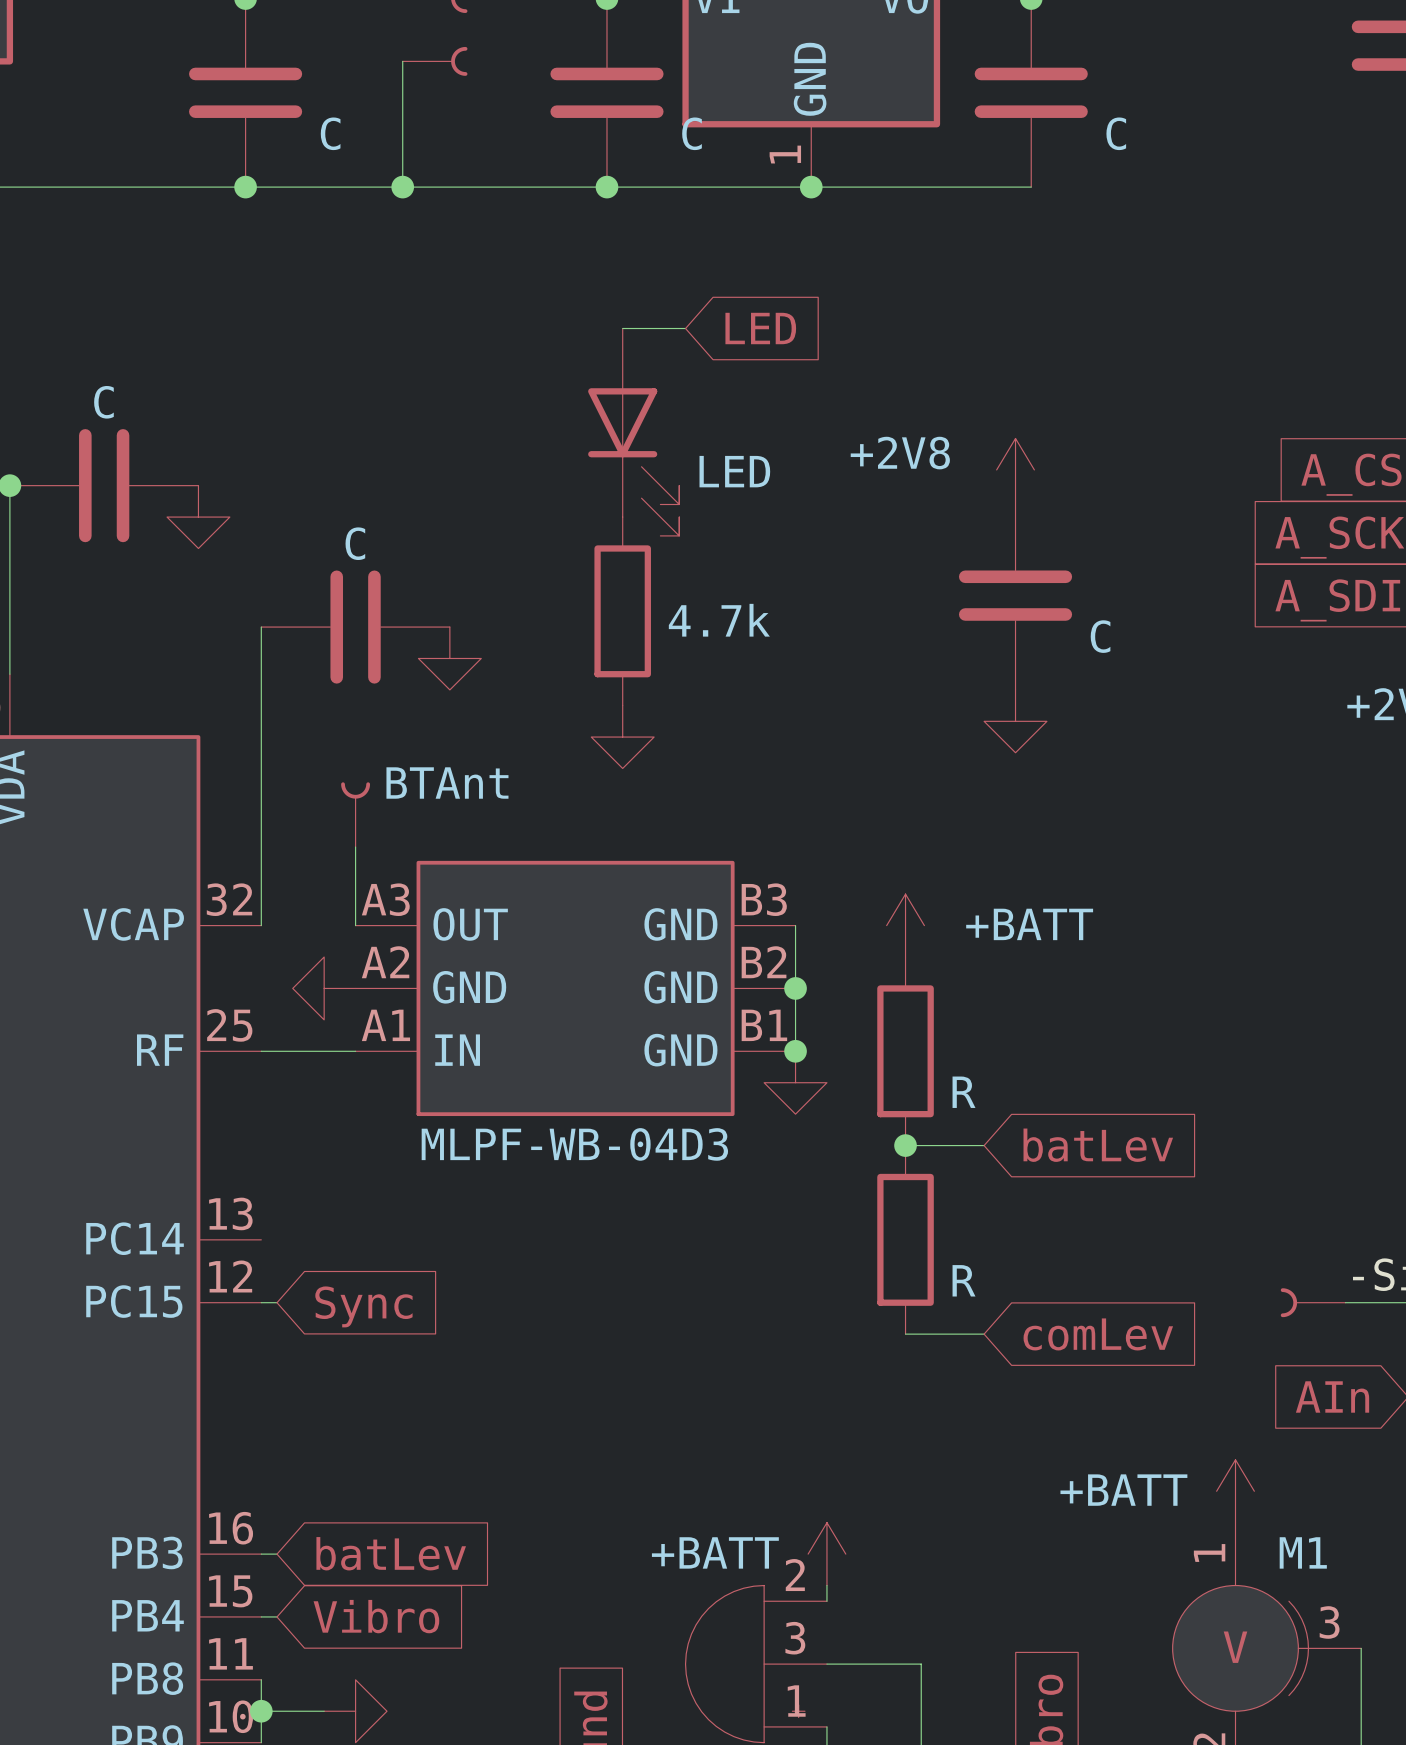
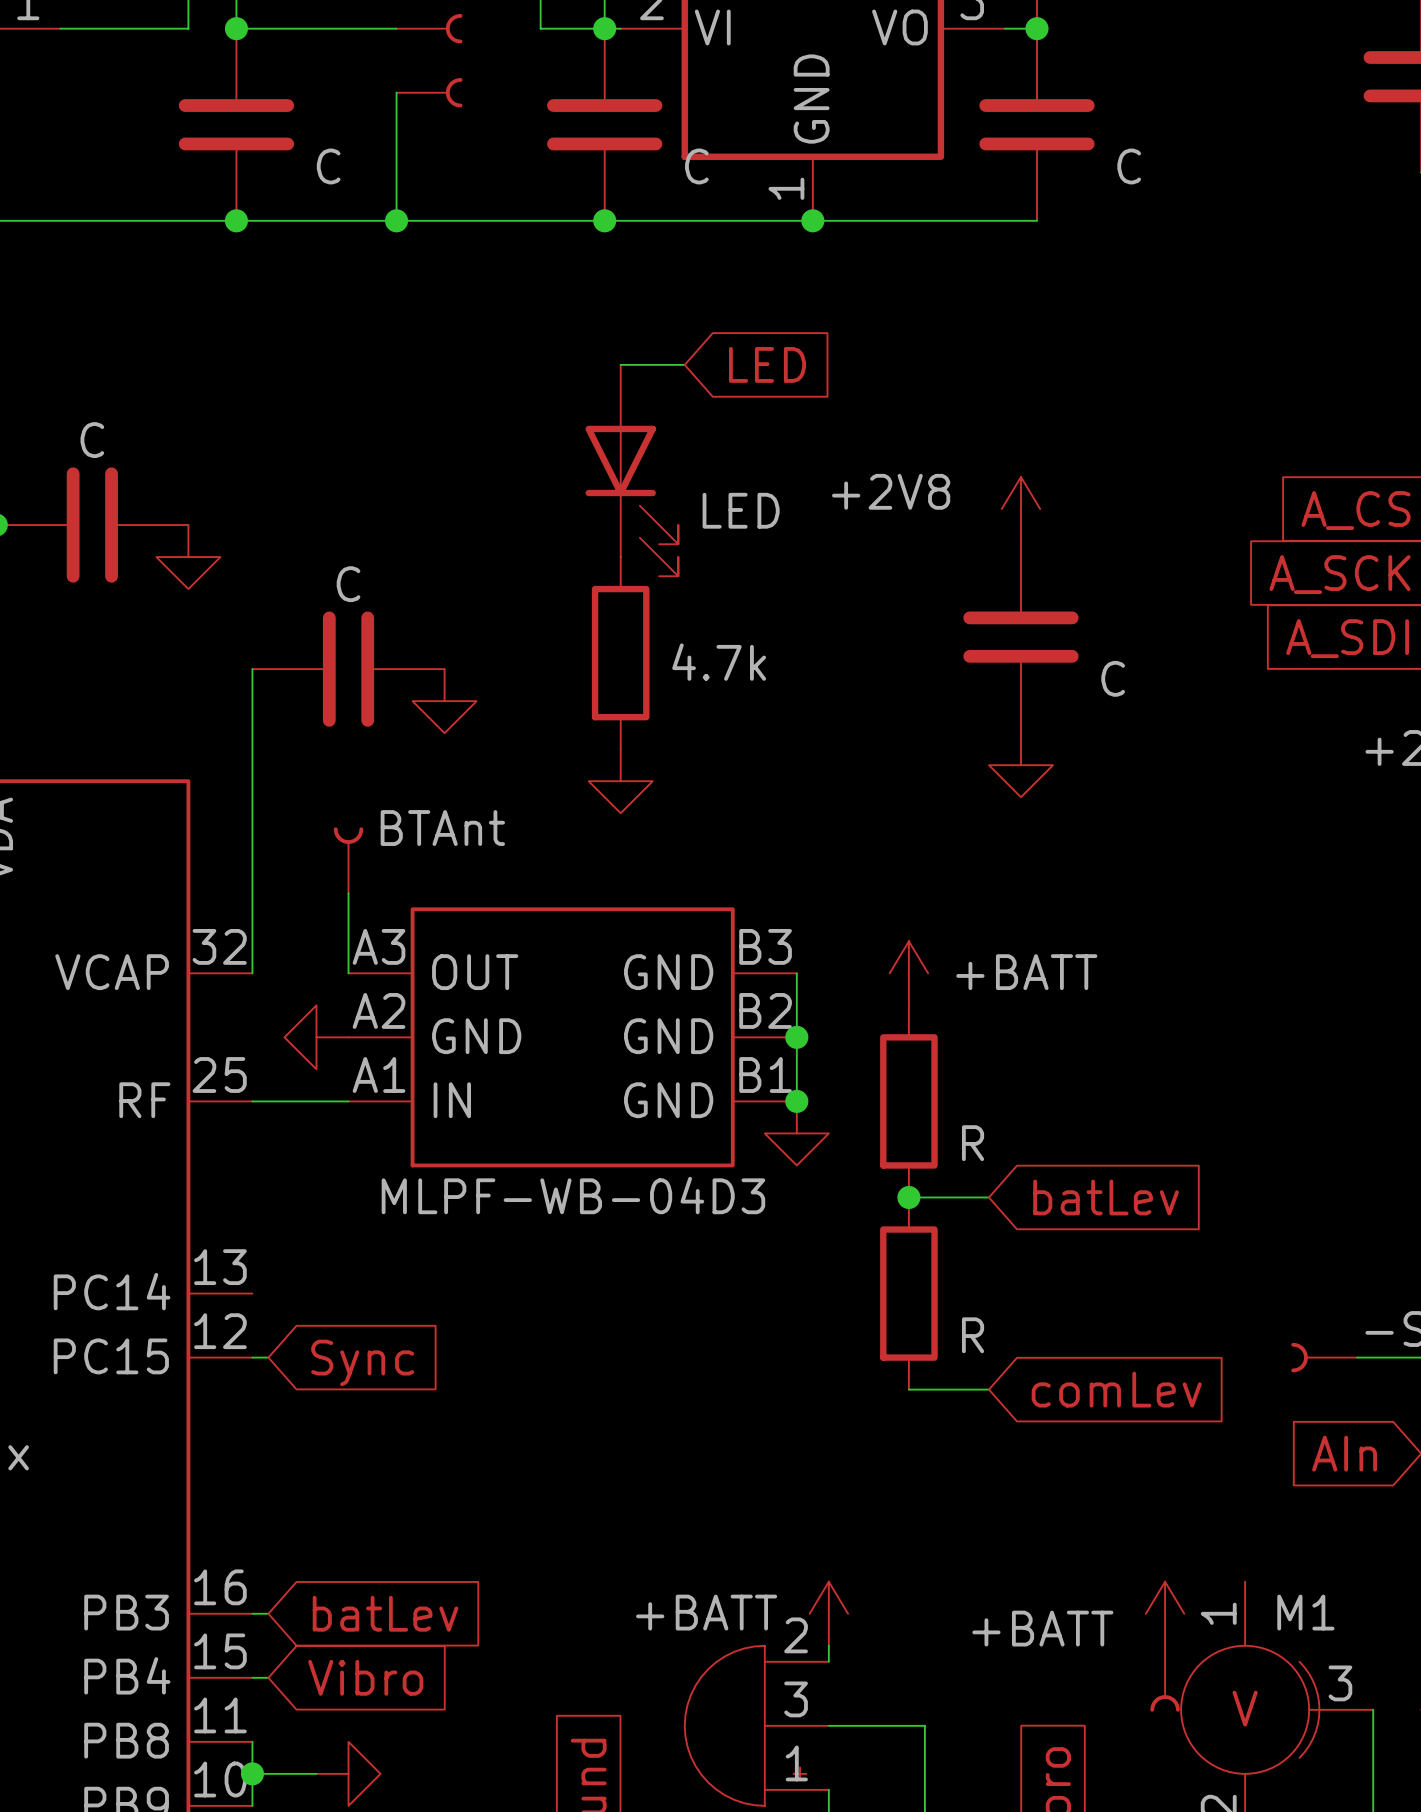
power symbol text position: +BATT (1123, 1490) -> +BATT (1042, 1628)
power symbol position: +BATT (1235, 1491) -> +BATT (1165, 1613)
part: none -> (1165, 1678)

